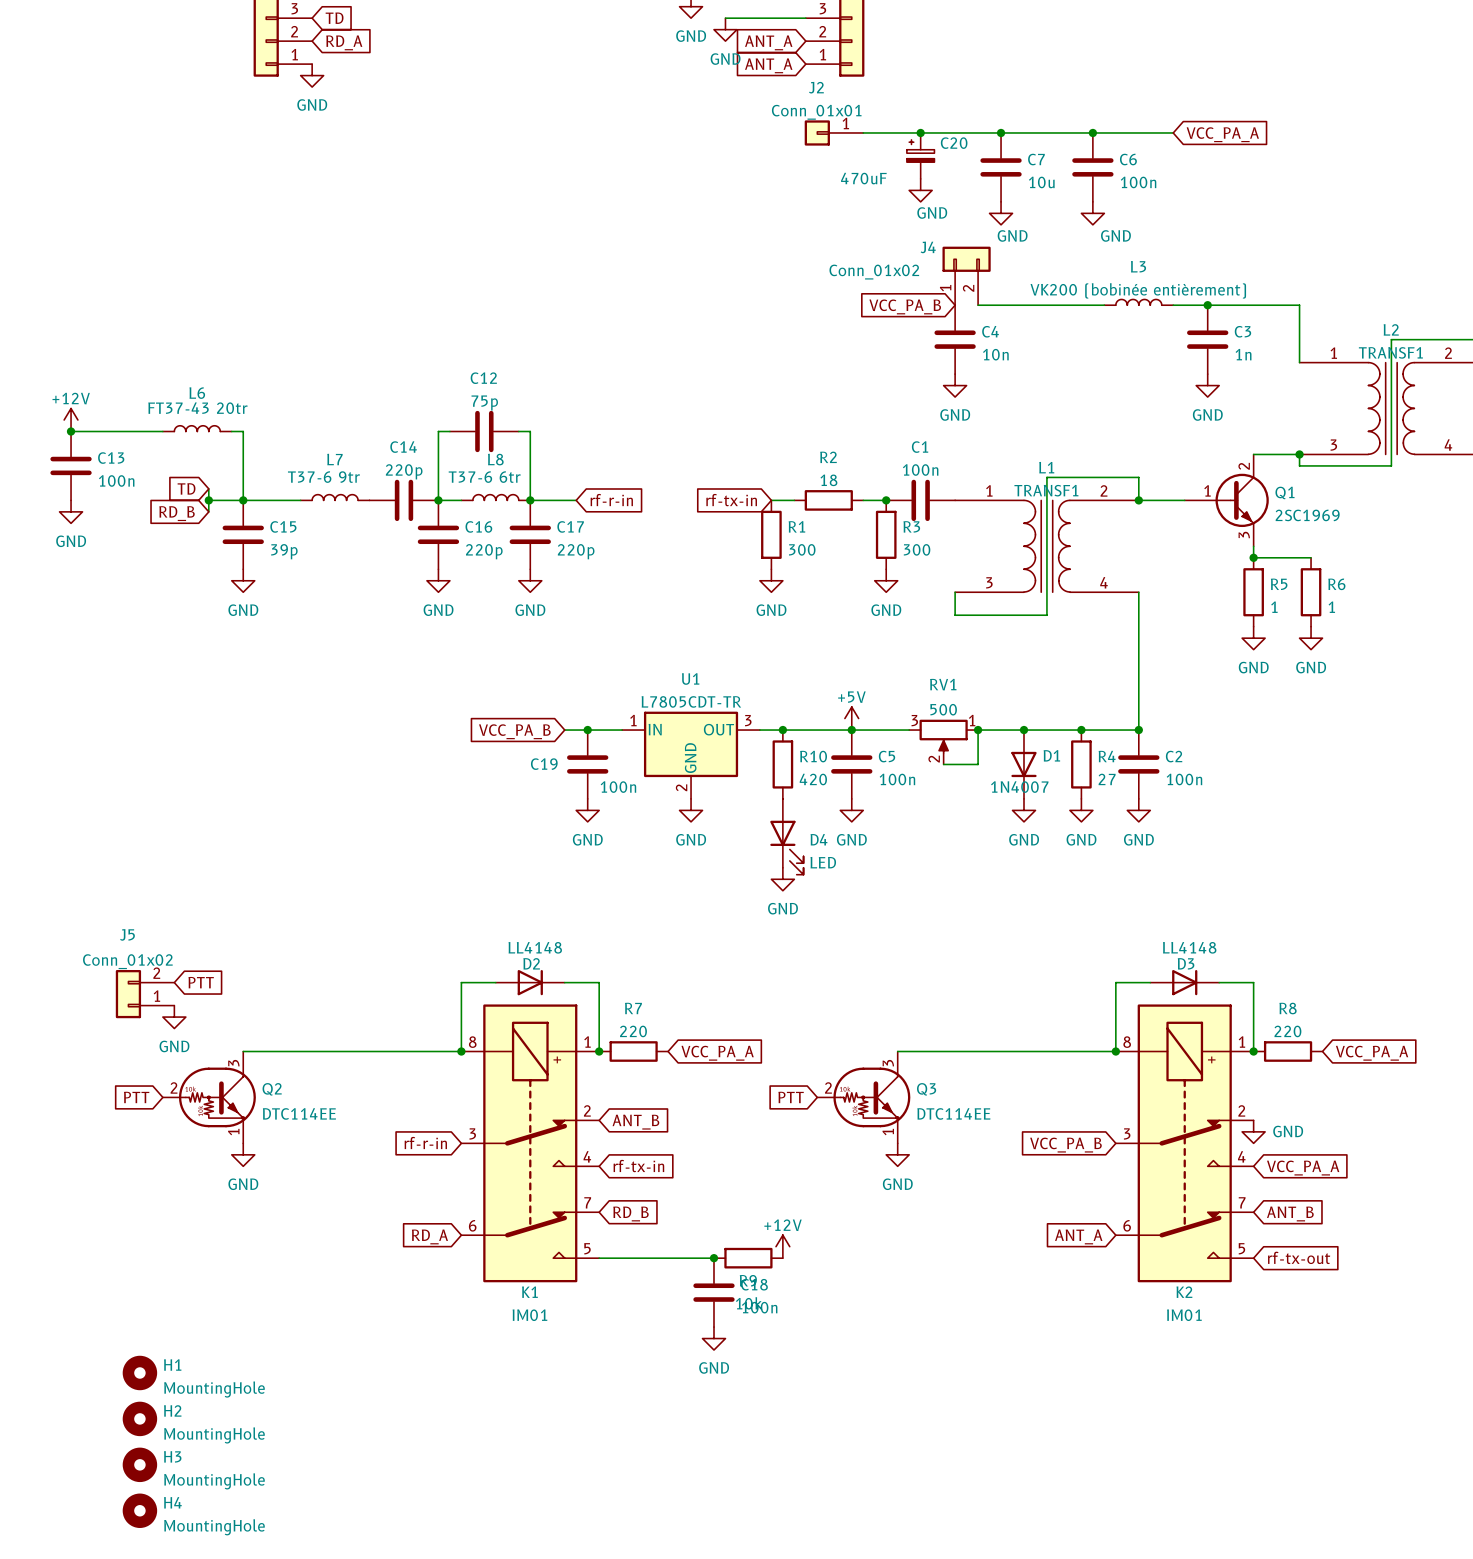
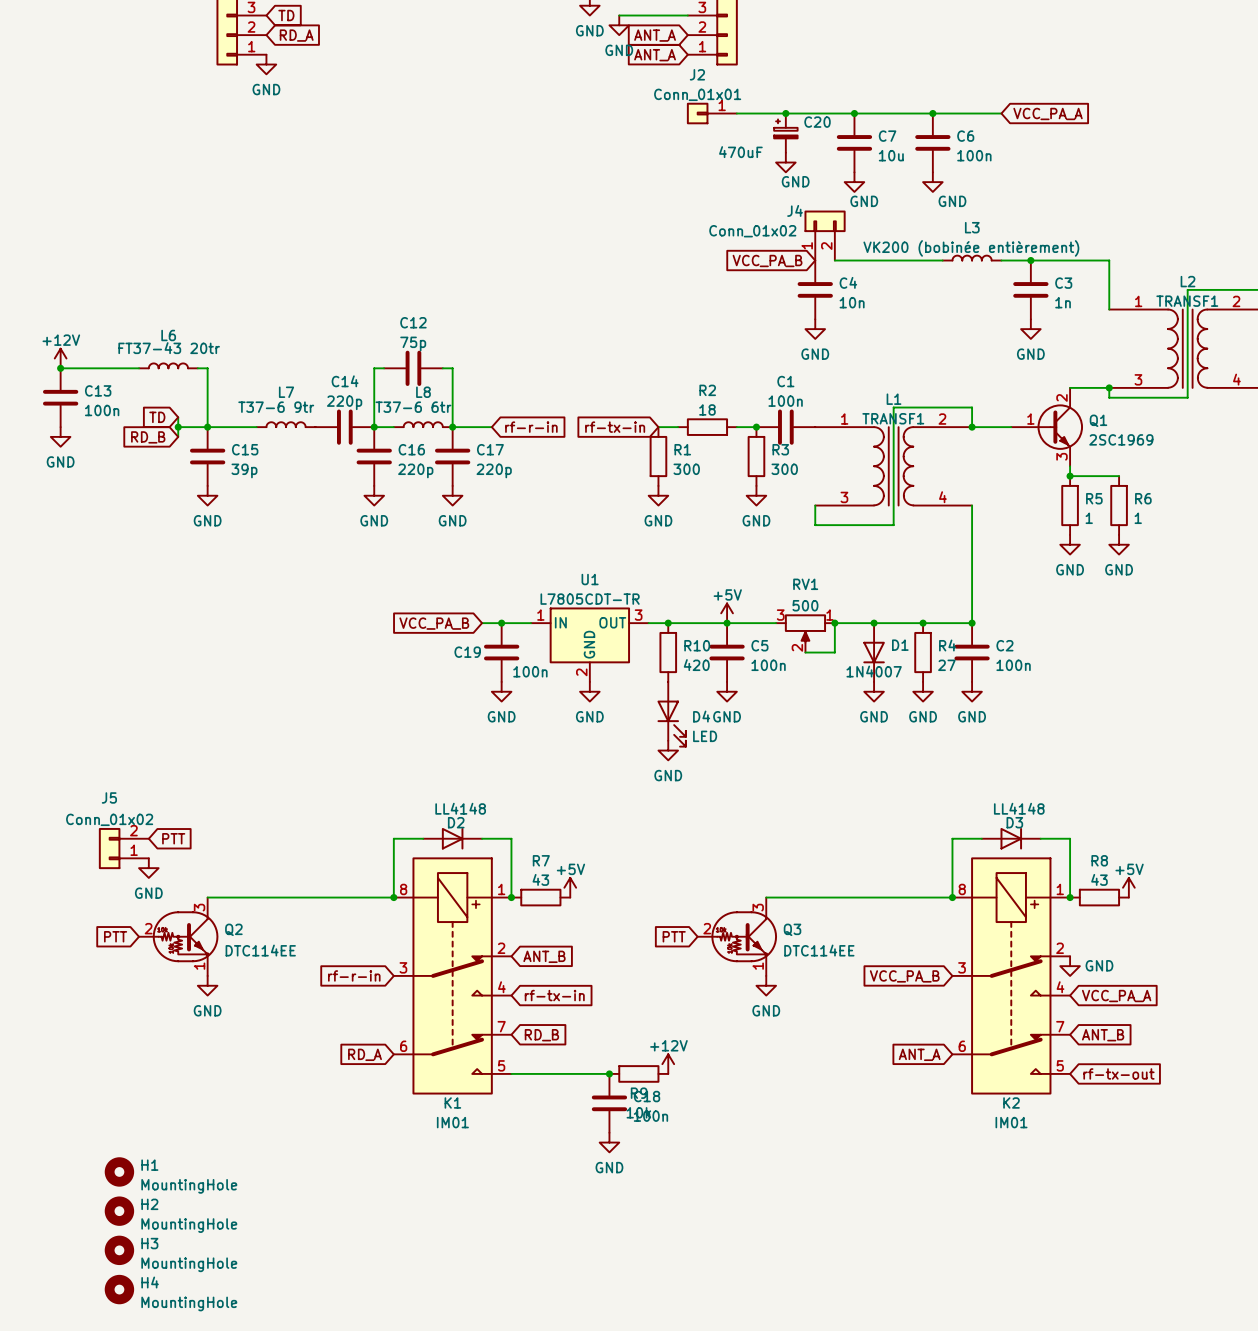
R7 value: 220 (633, 1031) -> 43 (540, 879)
R8 value: 220 (1287, 1031) -> 43 (1099, 879)
power symbol: none -> +5V (570, 887)
power symbol: none -> +5V (1128, 887)
global label: VCC_PA_A (717, 1053) -> none
global label: VCC_PA_A (1372, 1053) -> none

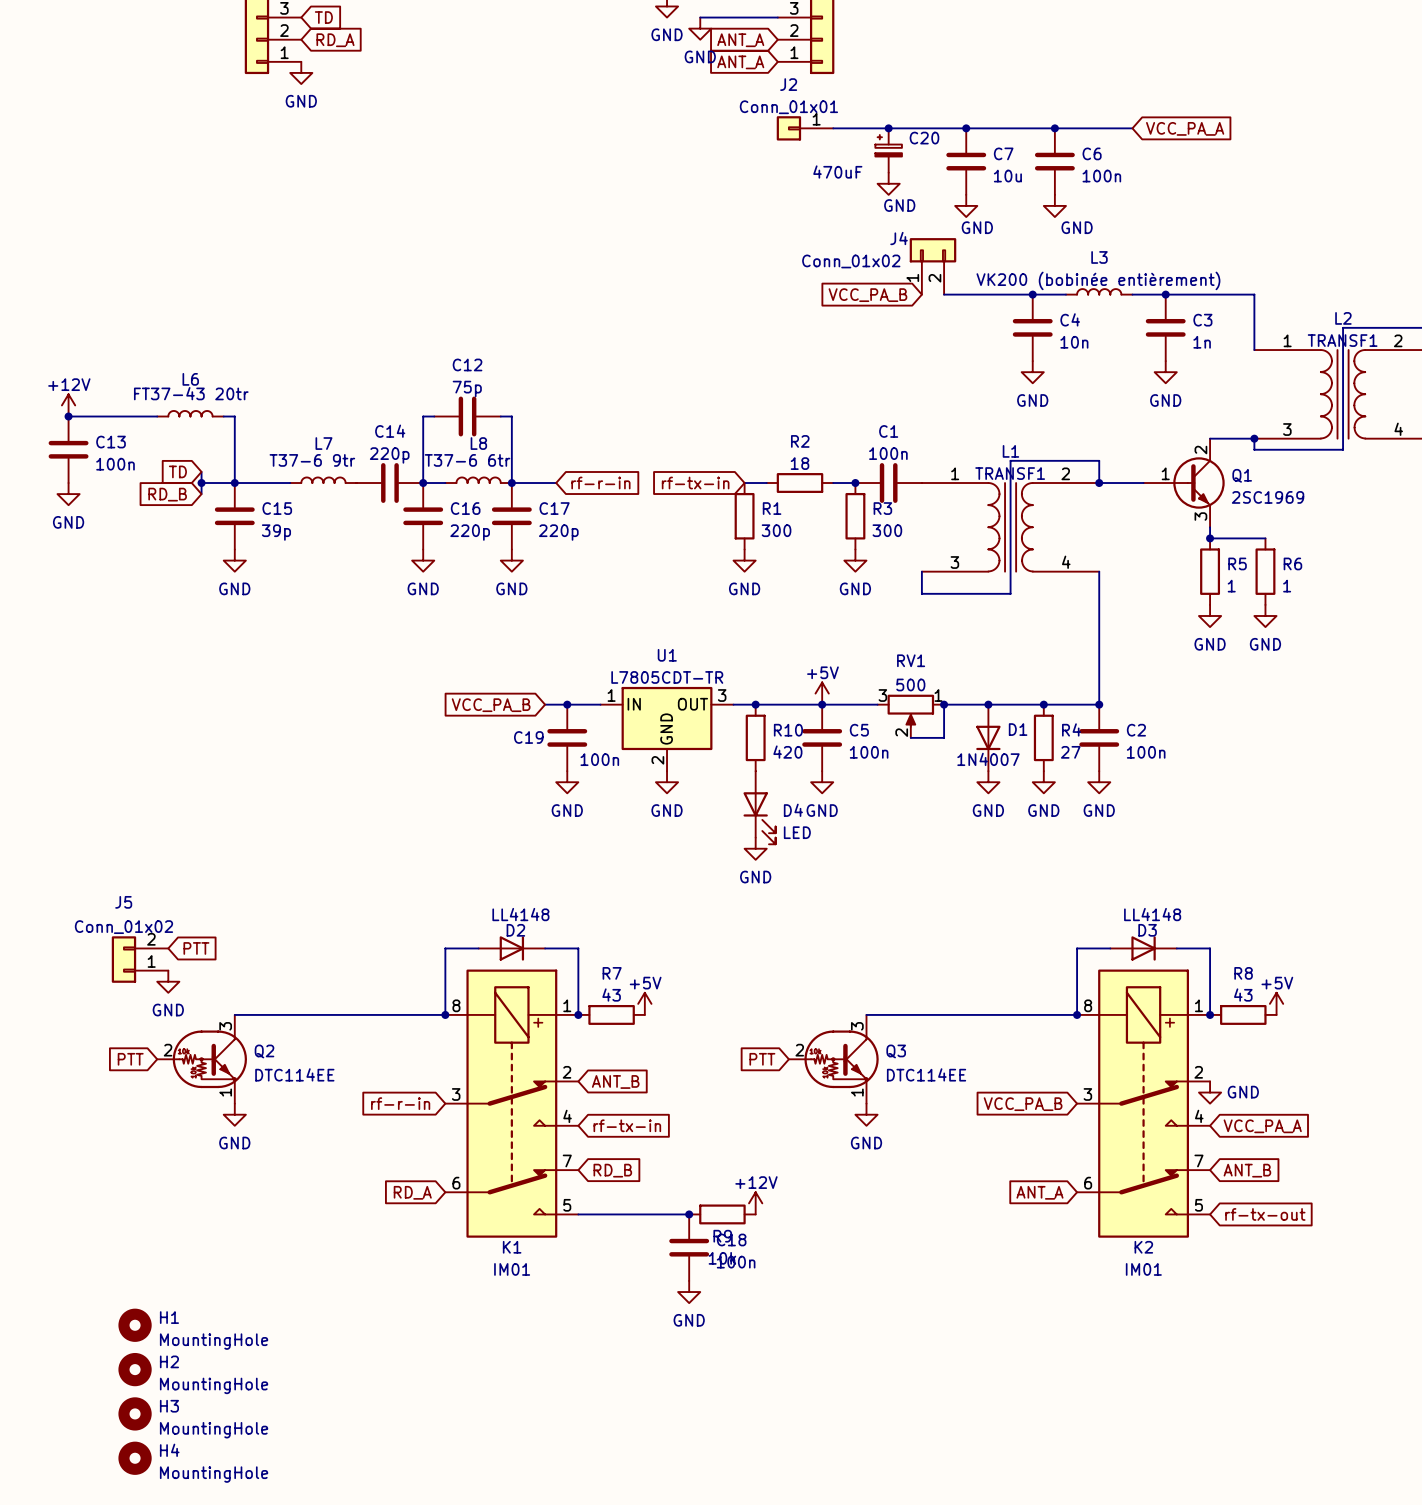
junction: none -> (1032, 294)
C4 position: (815, 289) -> (1032, 327)
power symbol position: GND (815, 329) -> GND (1032, 372)

